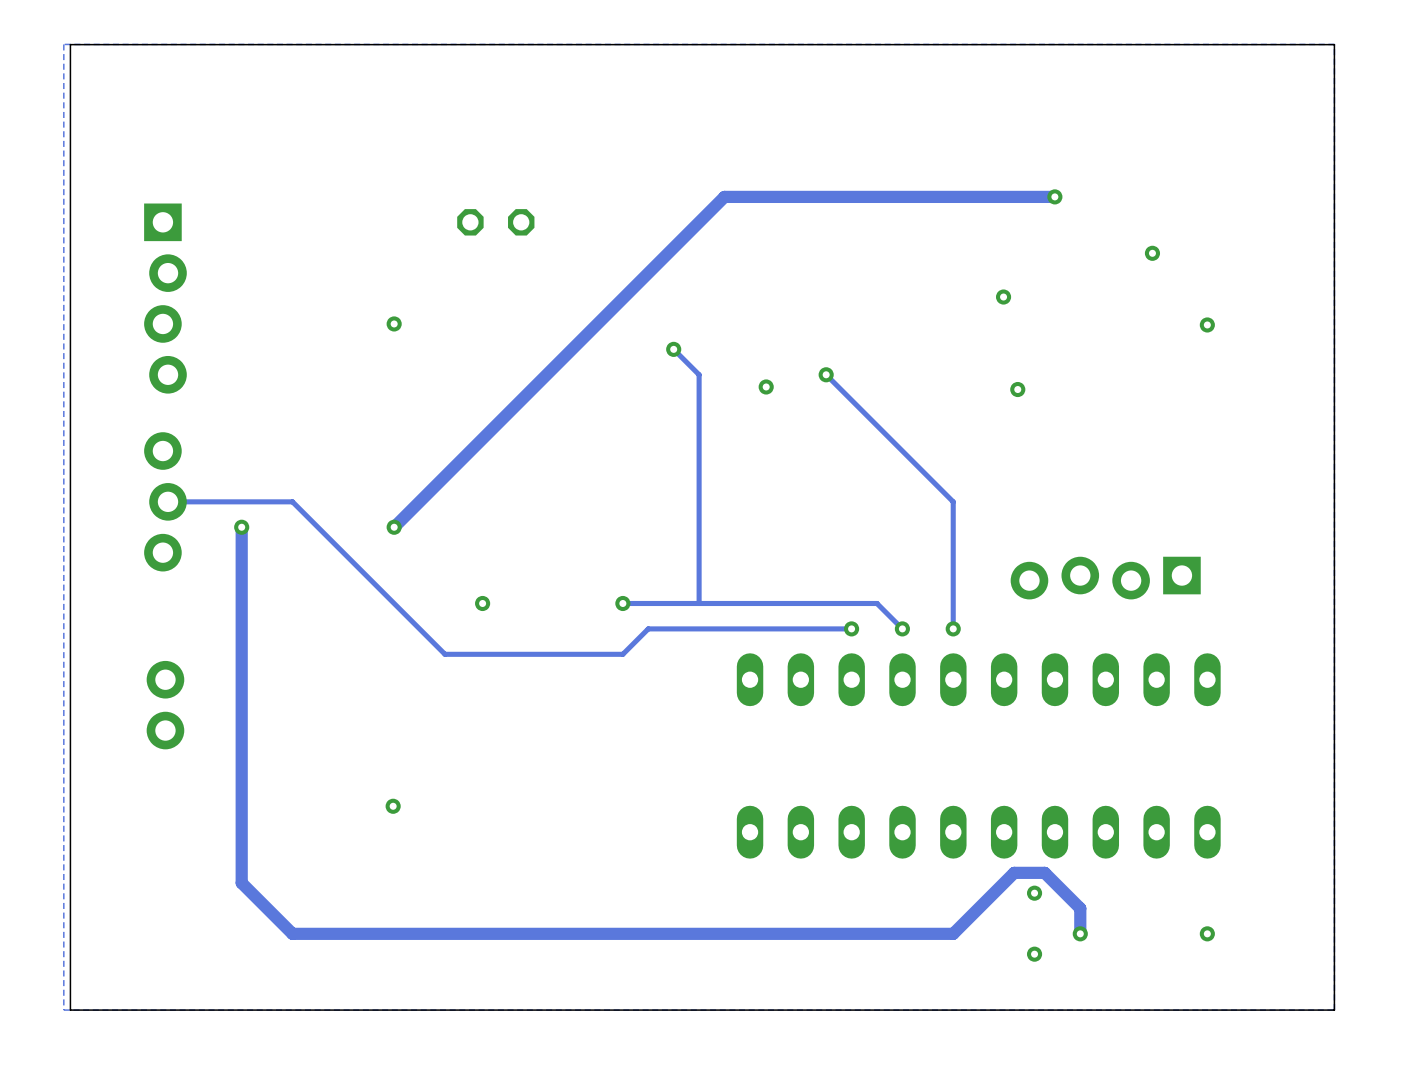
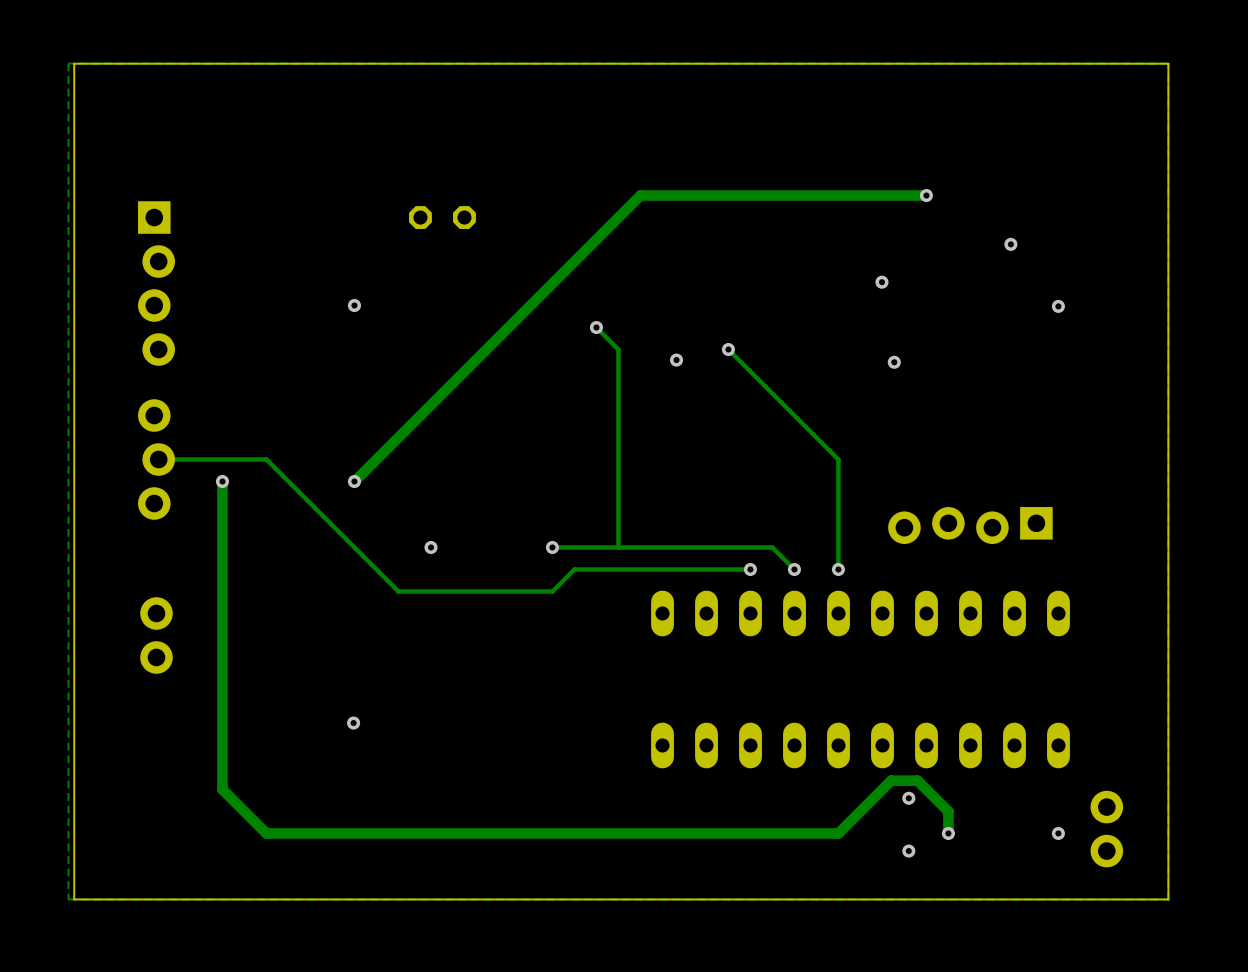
part: none -> (1106, 829)

